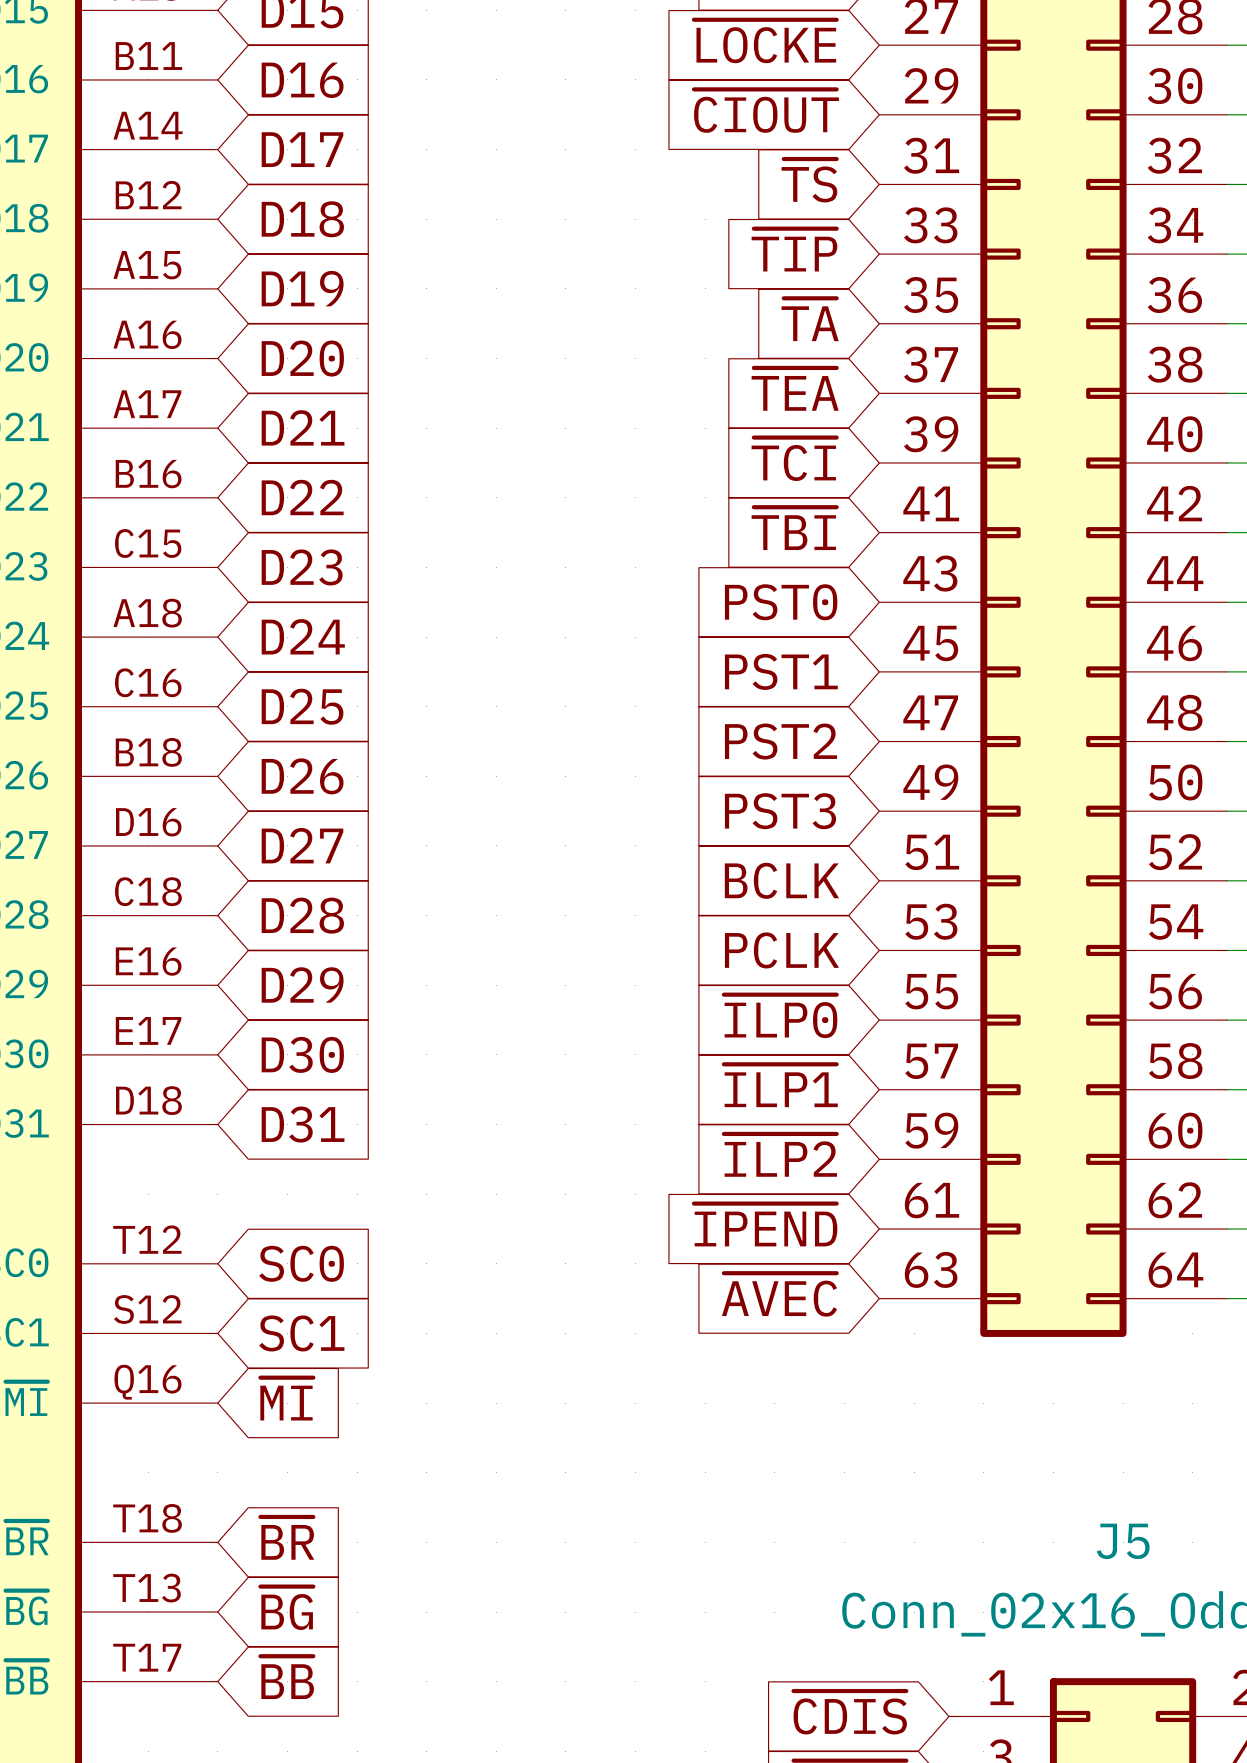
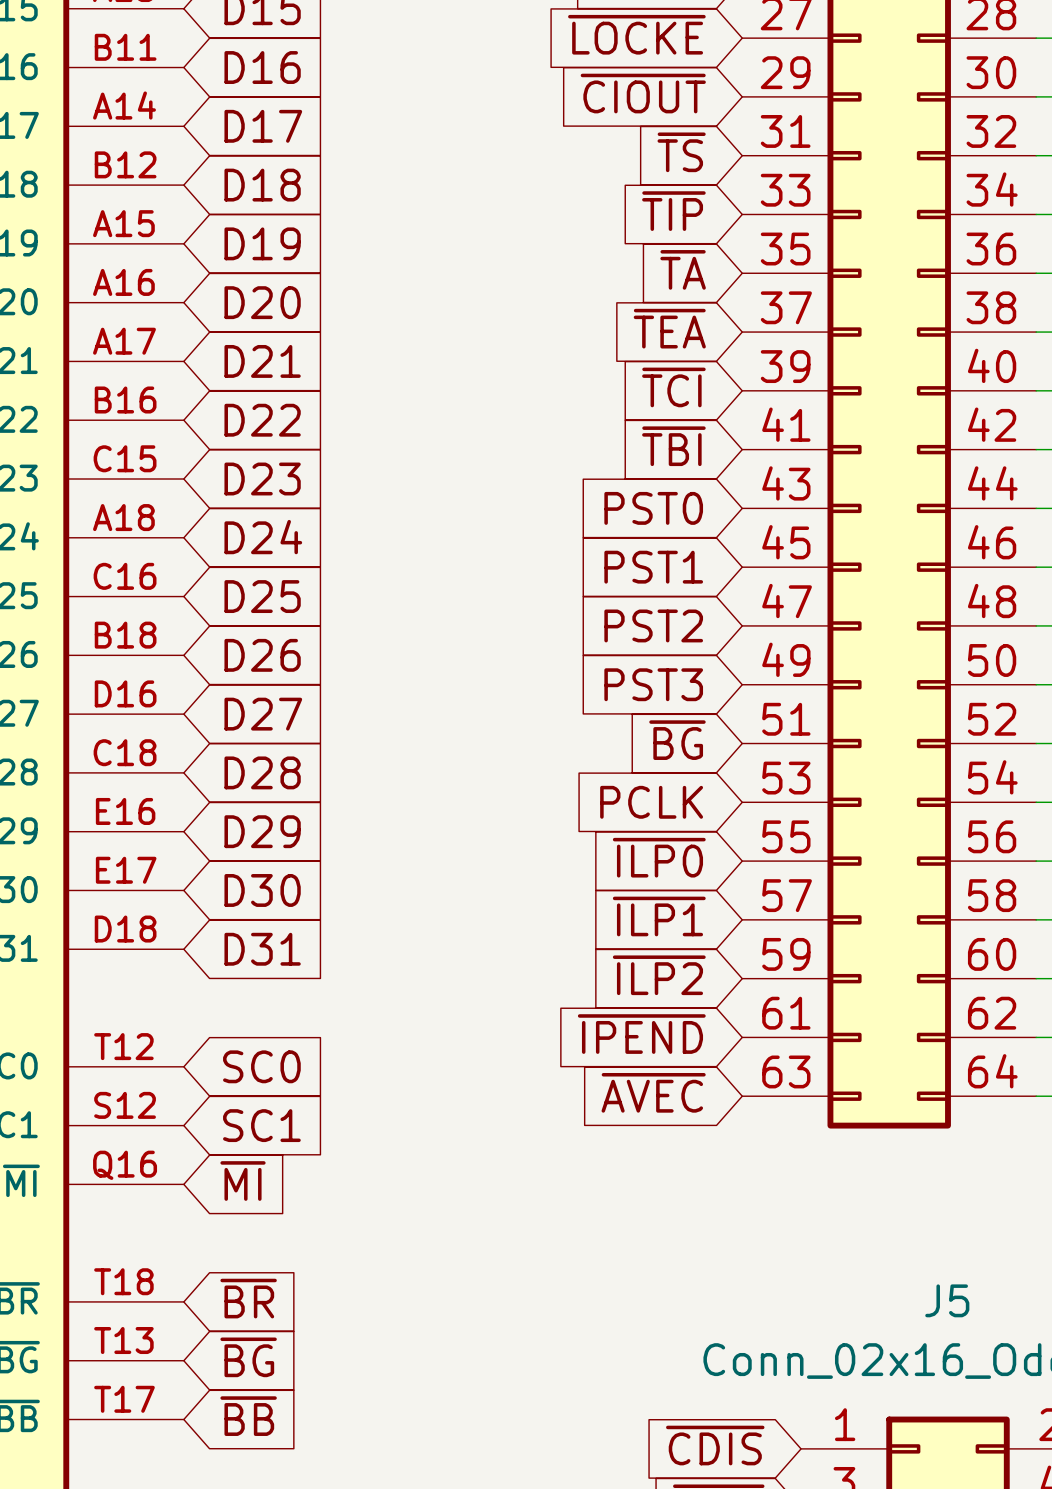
global label: BCLK (781, 880) -> ~{BG} (677, 740)

